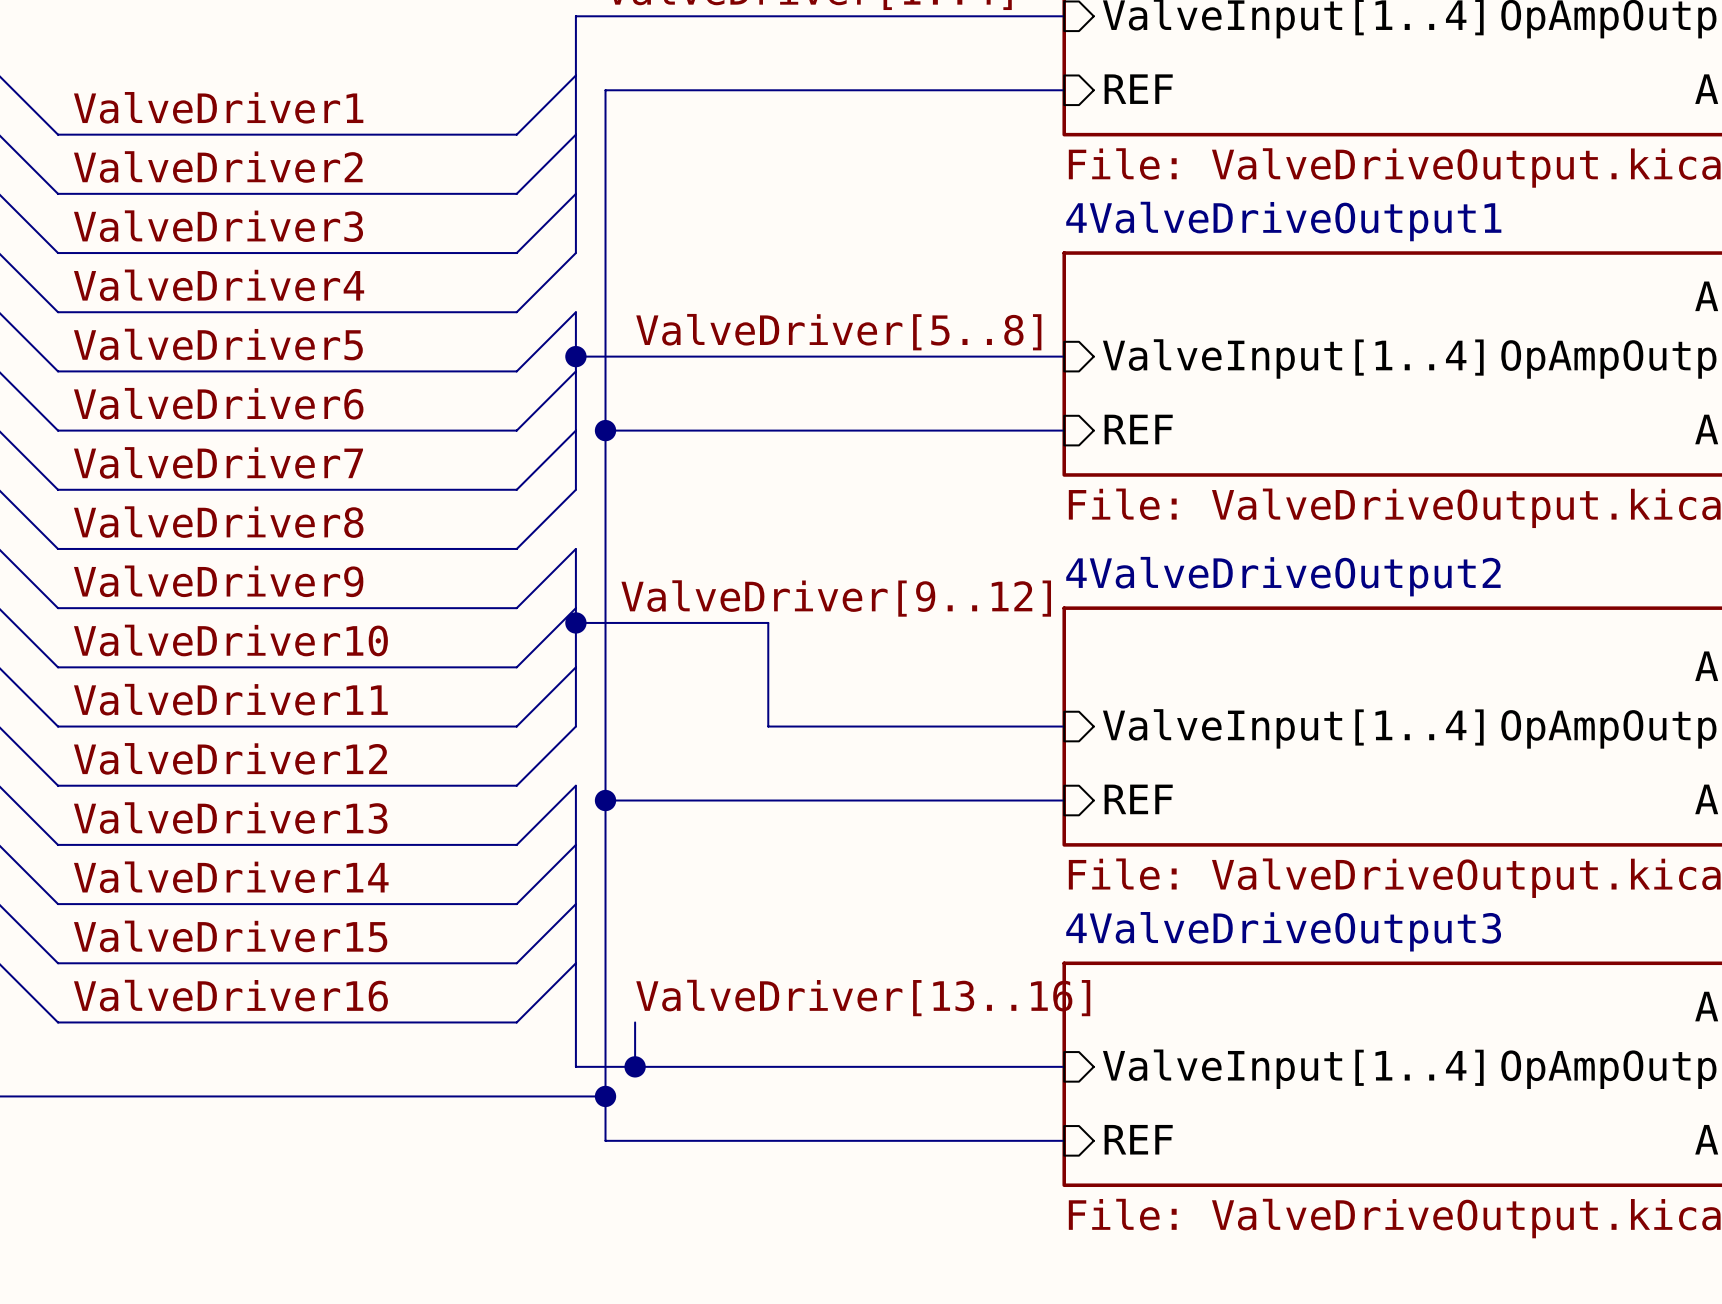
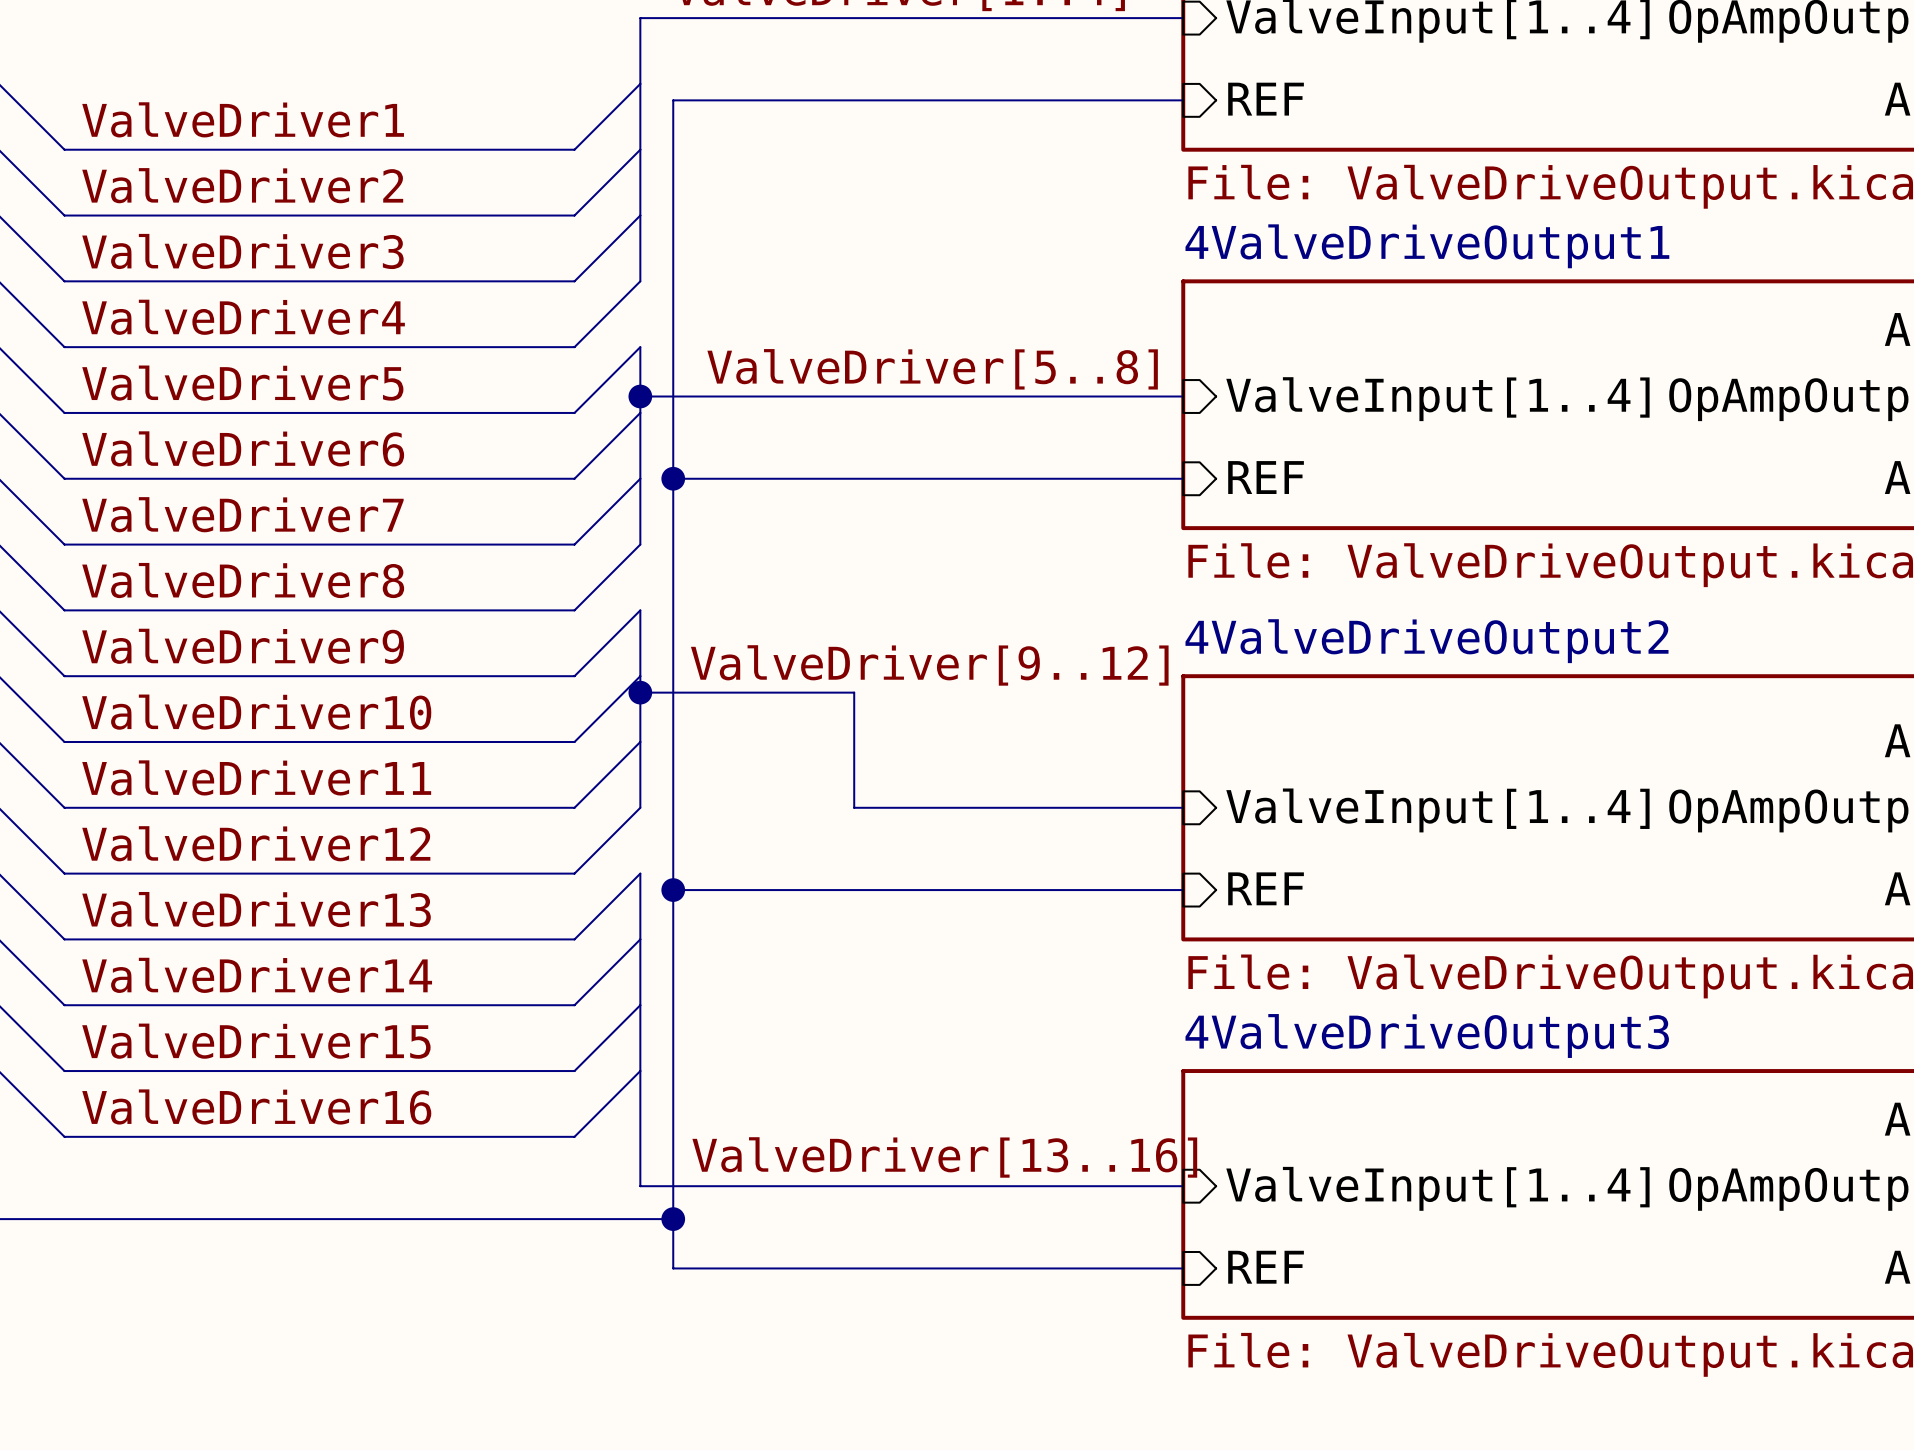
label position: ValveDriver[13..16] (863, 998) -> ValveDriver[13..16] (944, 1157)
bus: (635, 1022) (635, 1066) -> none
junction: (635, 1066) -> none

